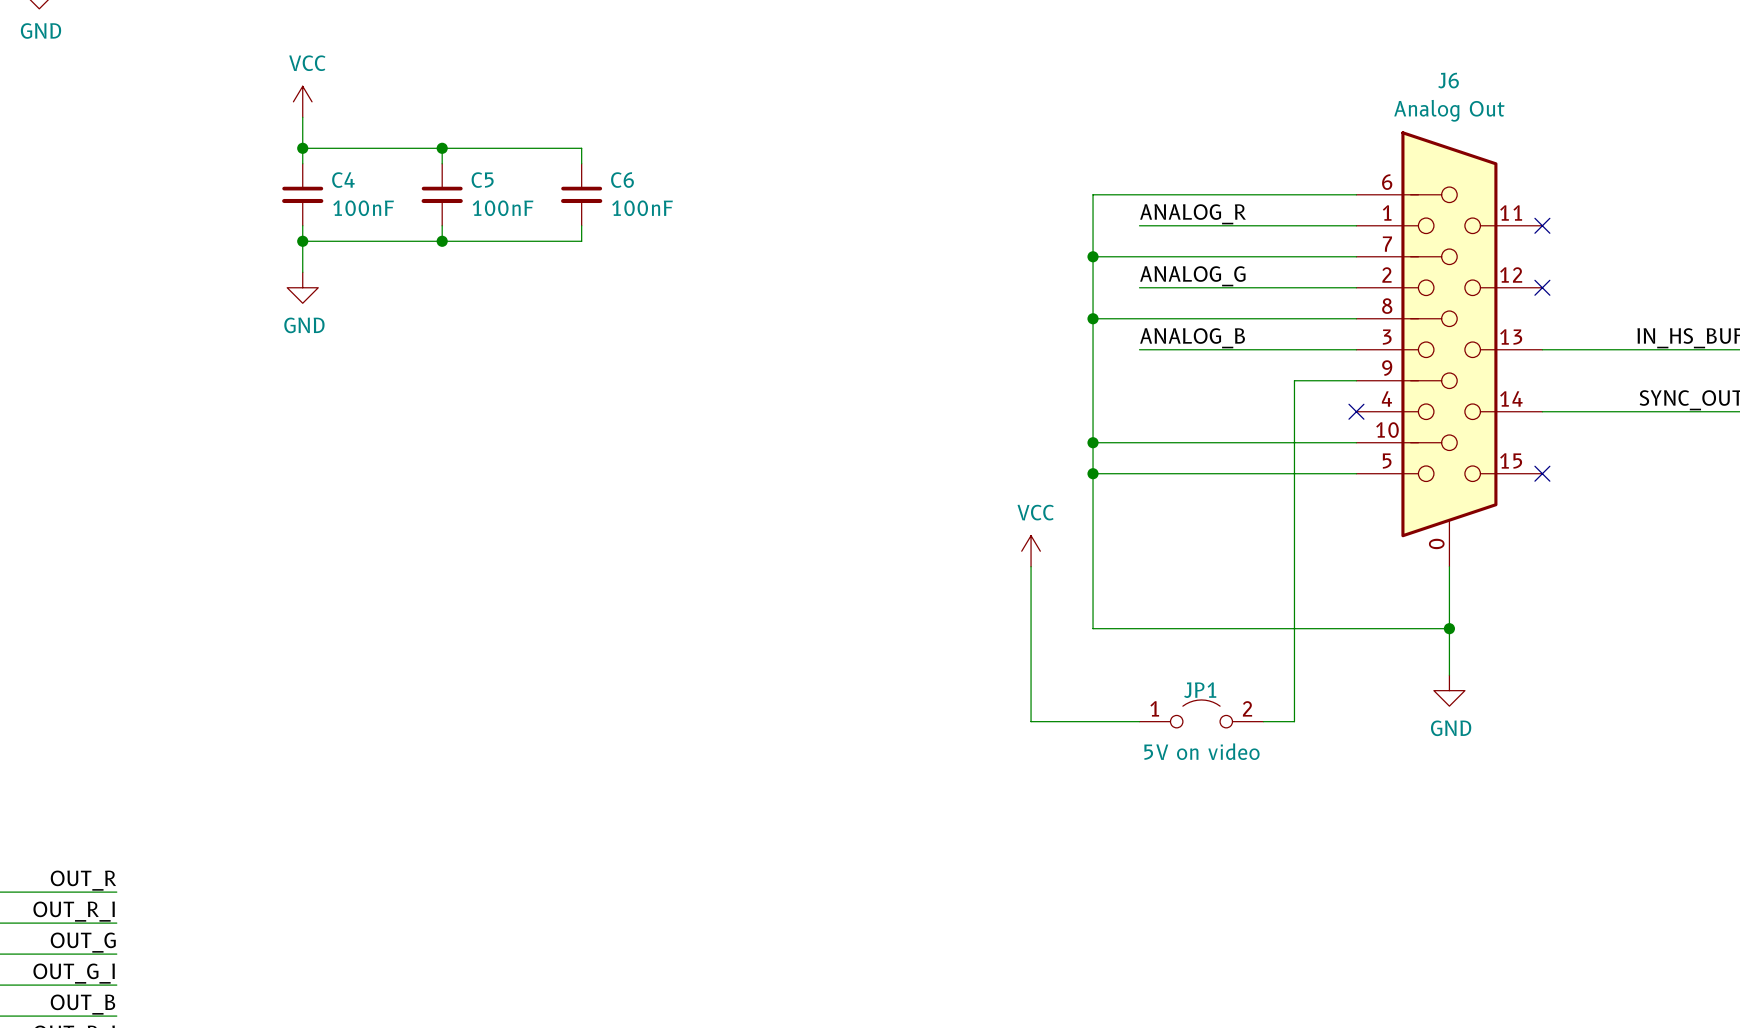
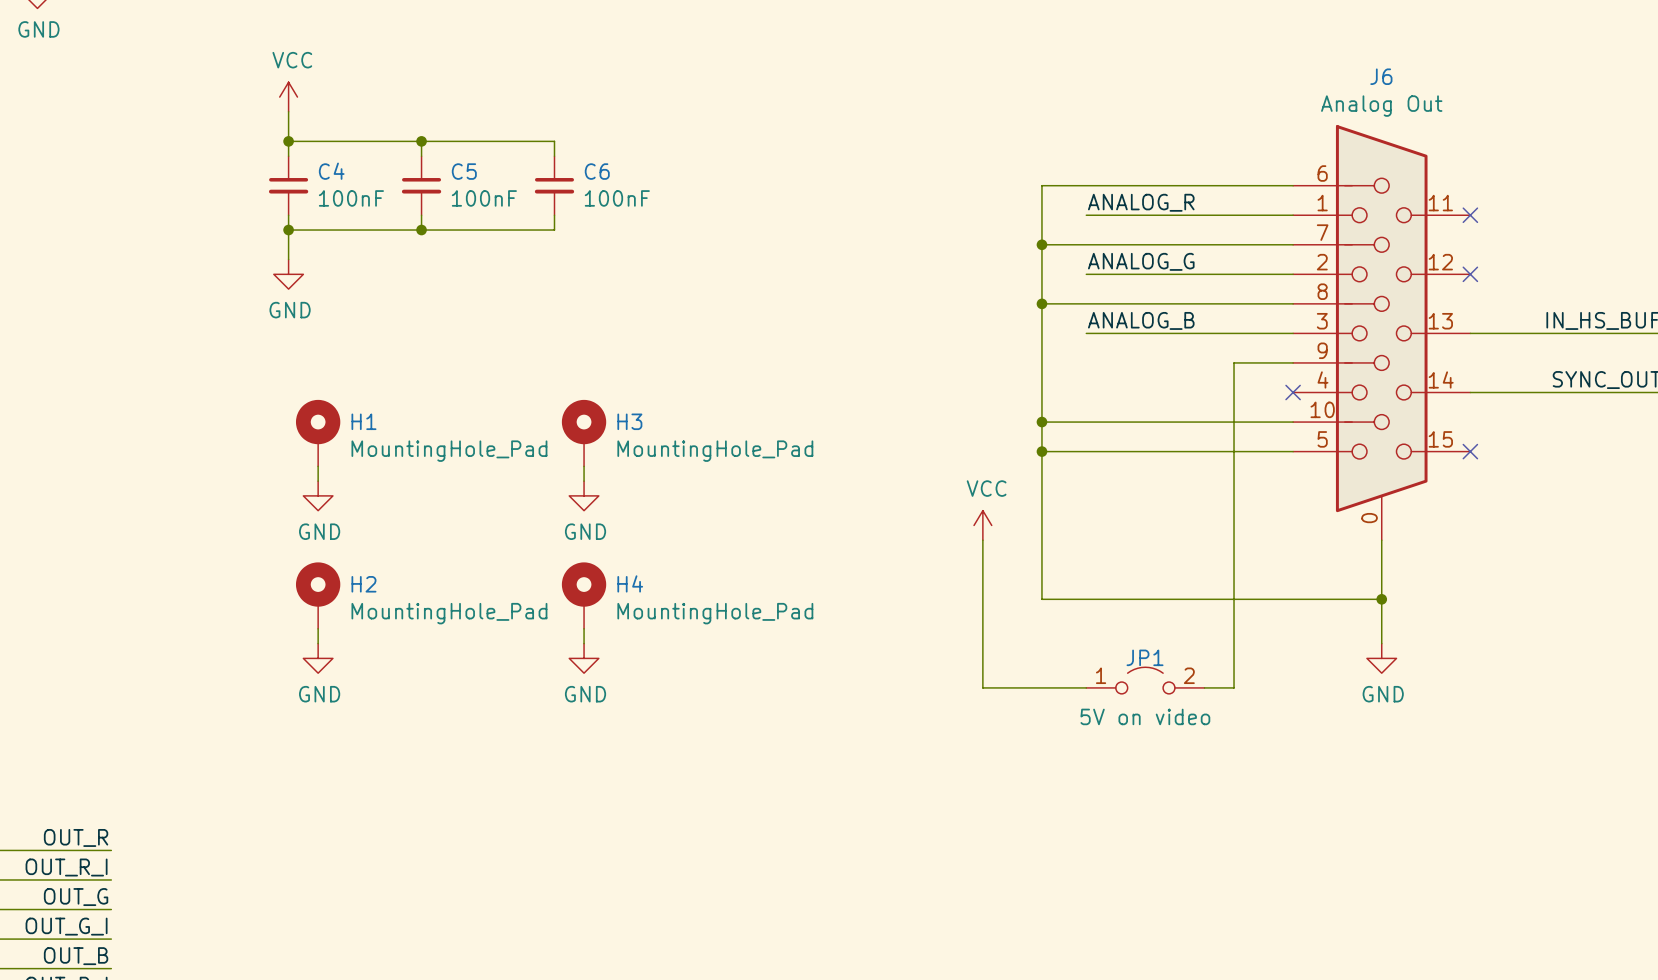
H1: none -> MountingHole_Pad (318, 433)
H3: none -> MountingHole_Pad (584, 433)
wire: none -> (318, 466) (318, 481)
wire: none -> (584, 466) (584, 481)
power symbol: none -> GND (318, 495)
power symbol: none -> GND (584, 495)
H2: none -> MountingHole_Pad (318, 595)
H4: none -> MountingHole_Pad (584, 595)
wire: none -> (318, 628) (318, 643)
wire: none -> (584, 628) (584, 643)
power symbol: none -> GND (318, 658)
power symbol: none -> GND (584, 658)

